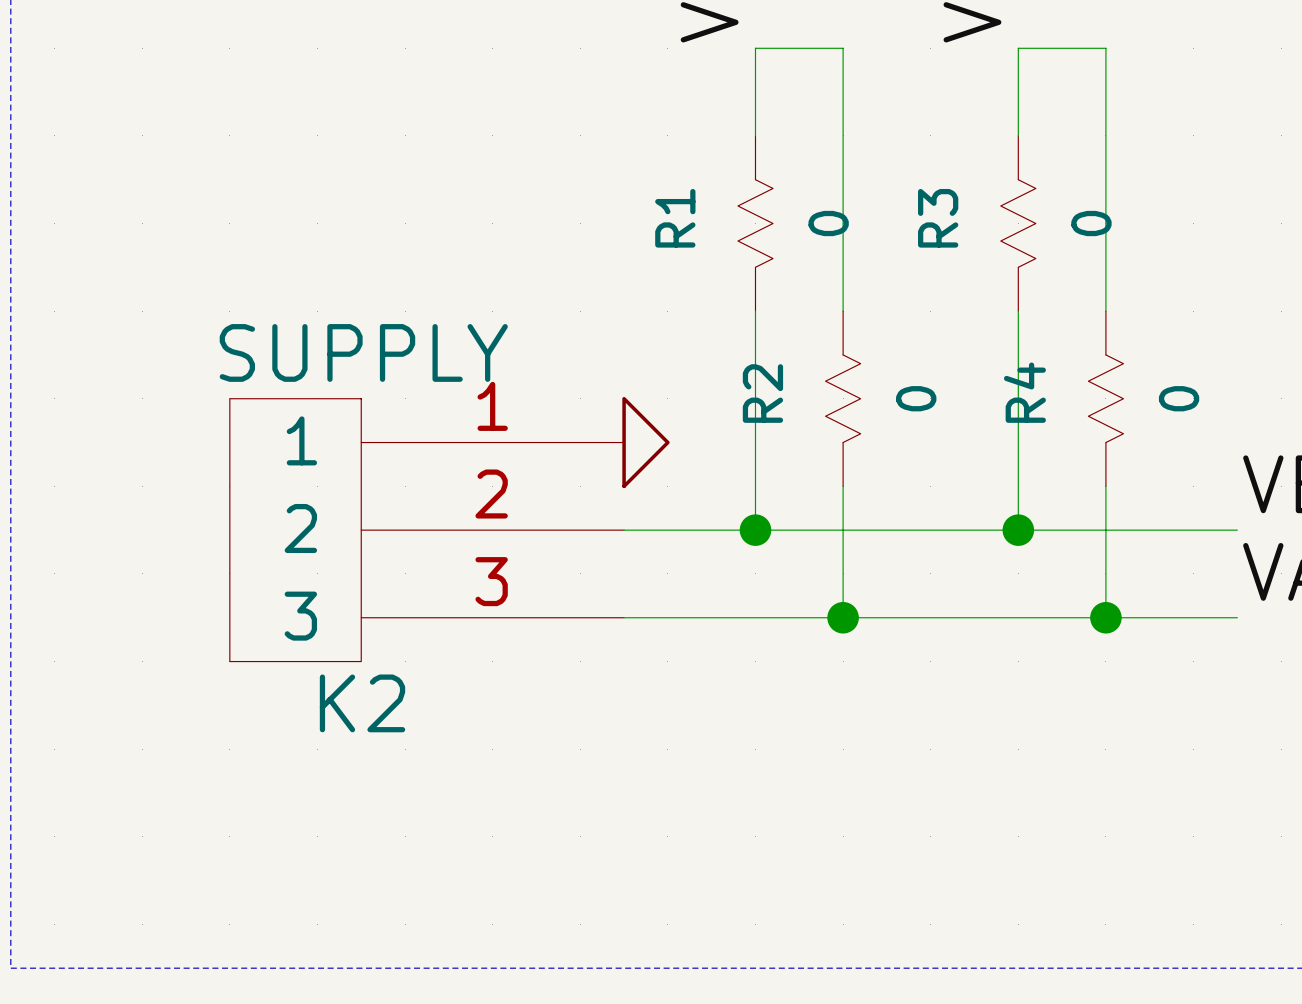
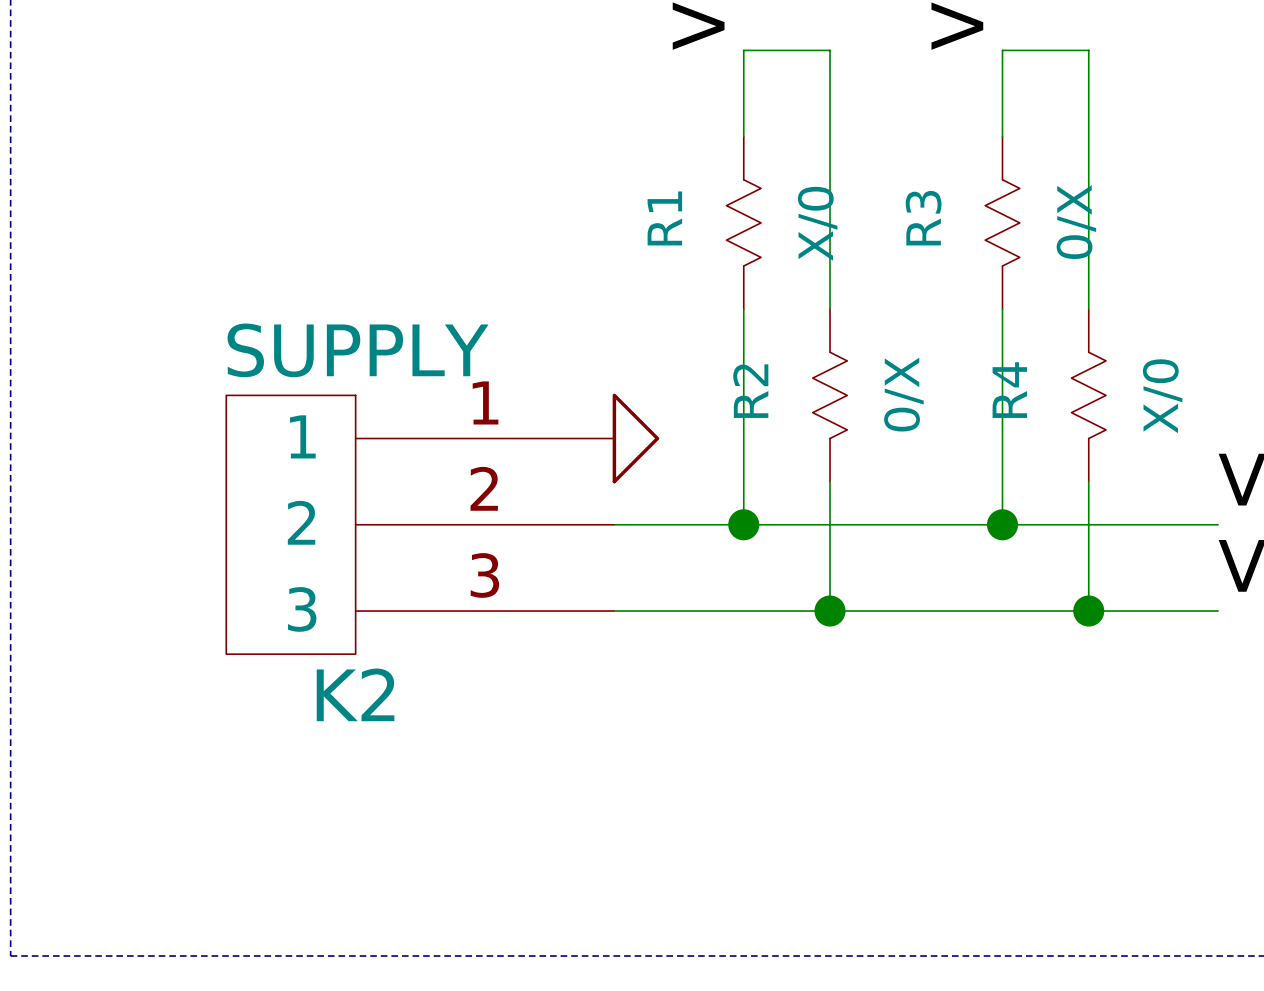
R1 value: 0 (828, 223) -> X/0 (817, 223)
R3 value: 0 (1091, 223) -> 0/X (1076, 222)
R2 value: 0 (916, 398) -> 0/X (903, 394)
R4 value: 0 (1179, 398) -> X/0 (1162, 396)

